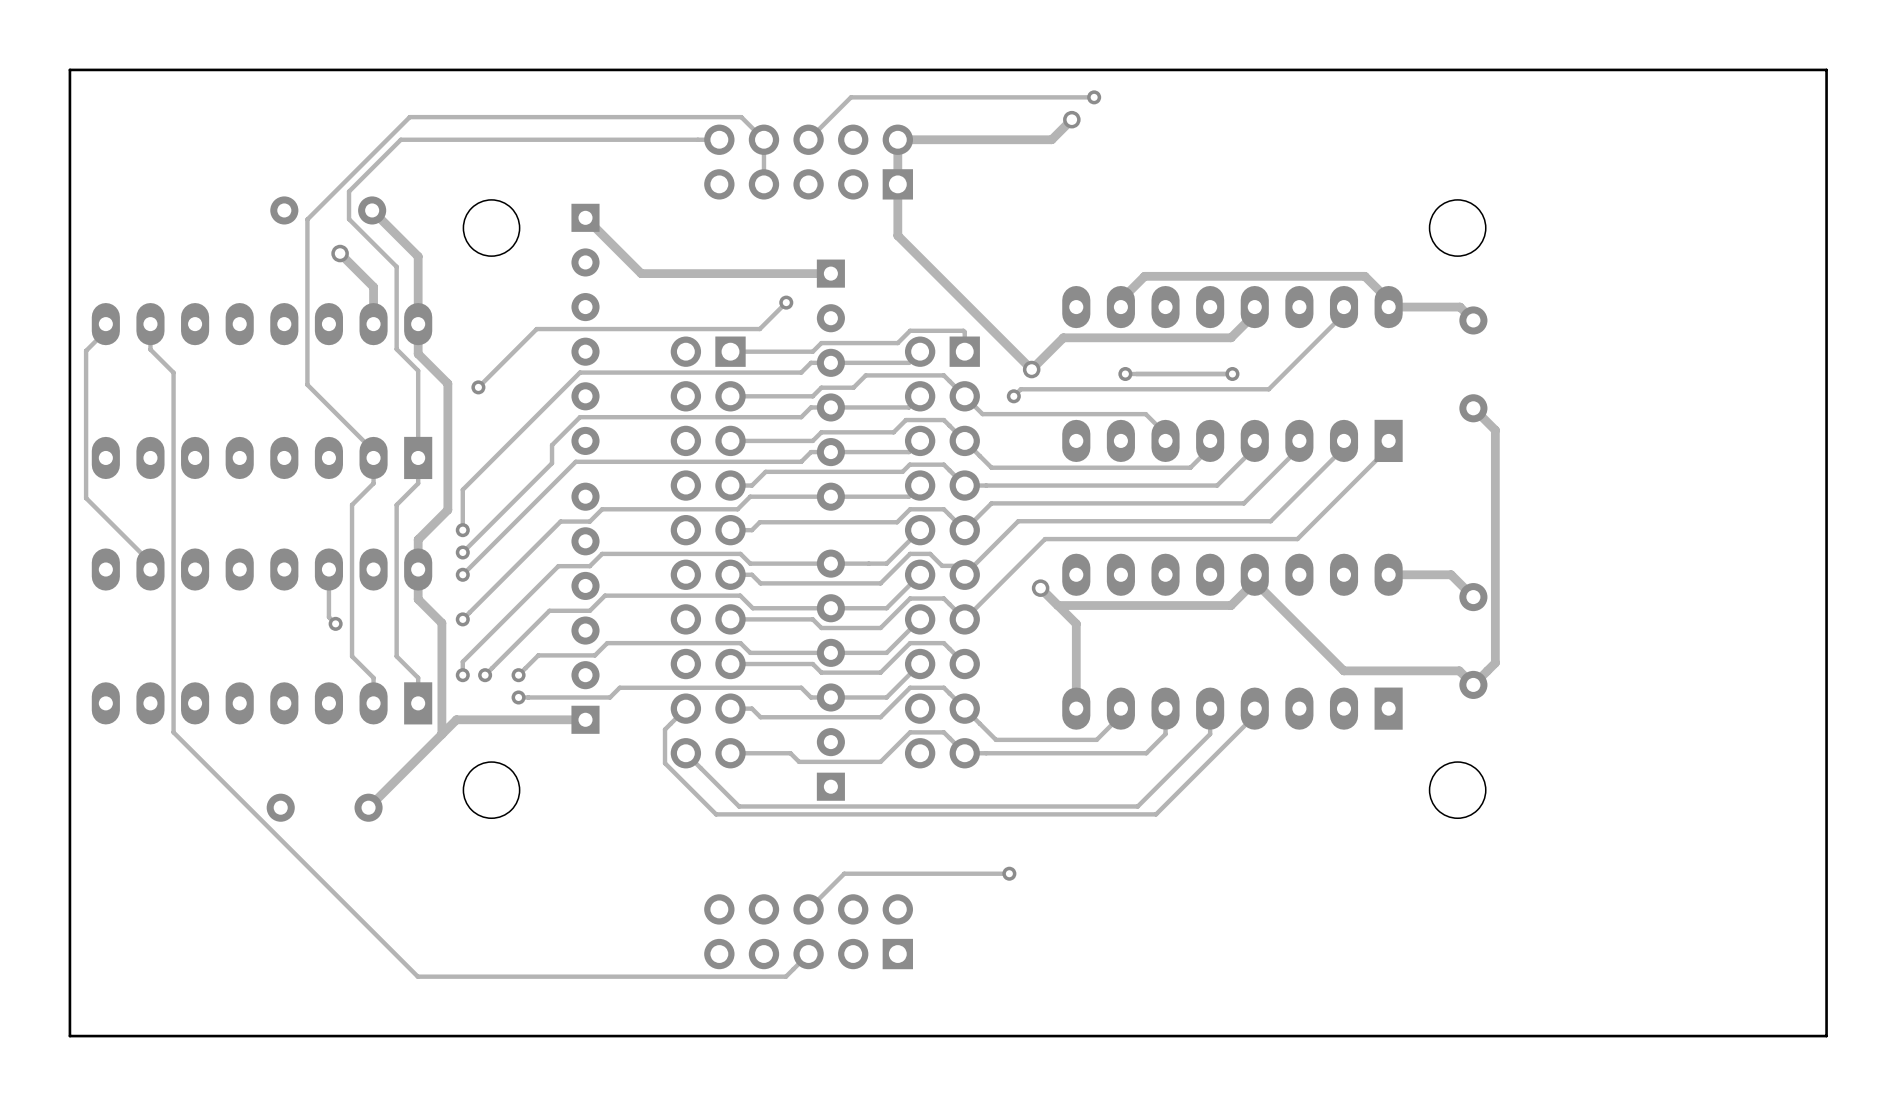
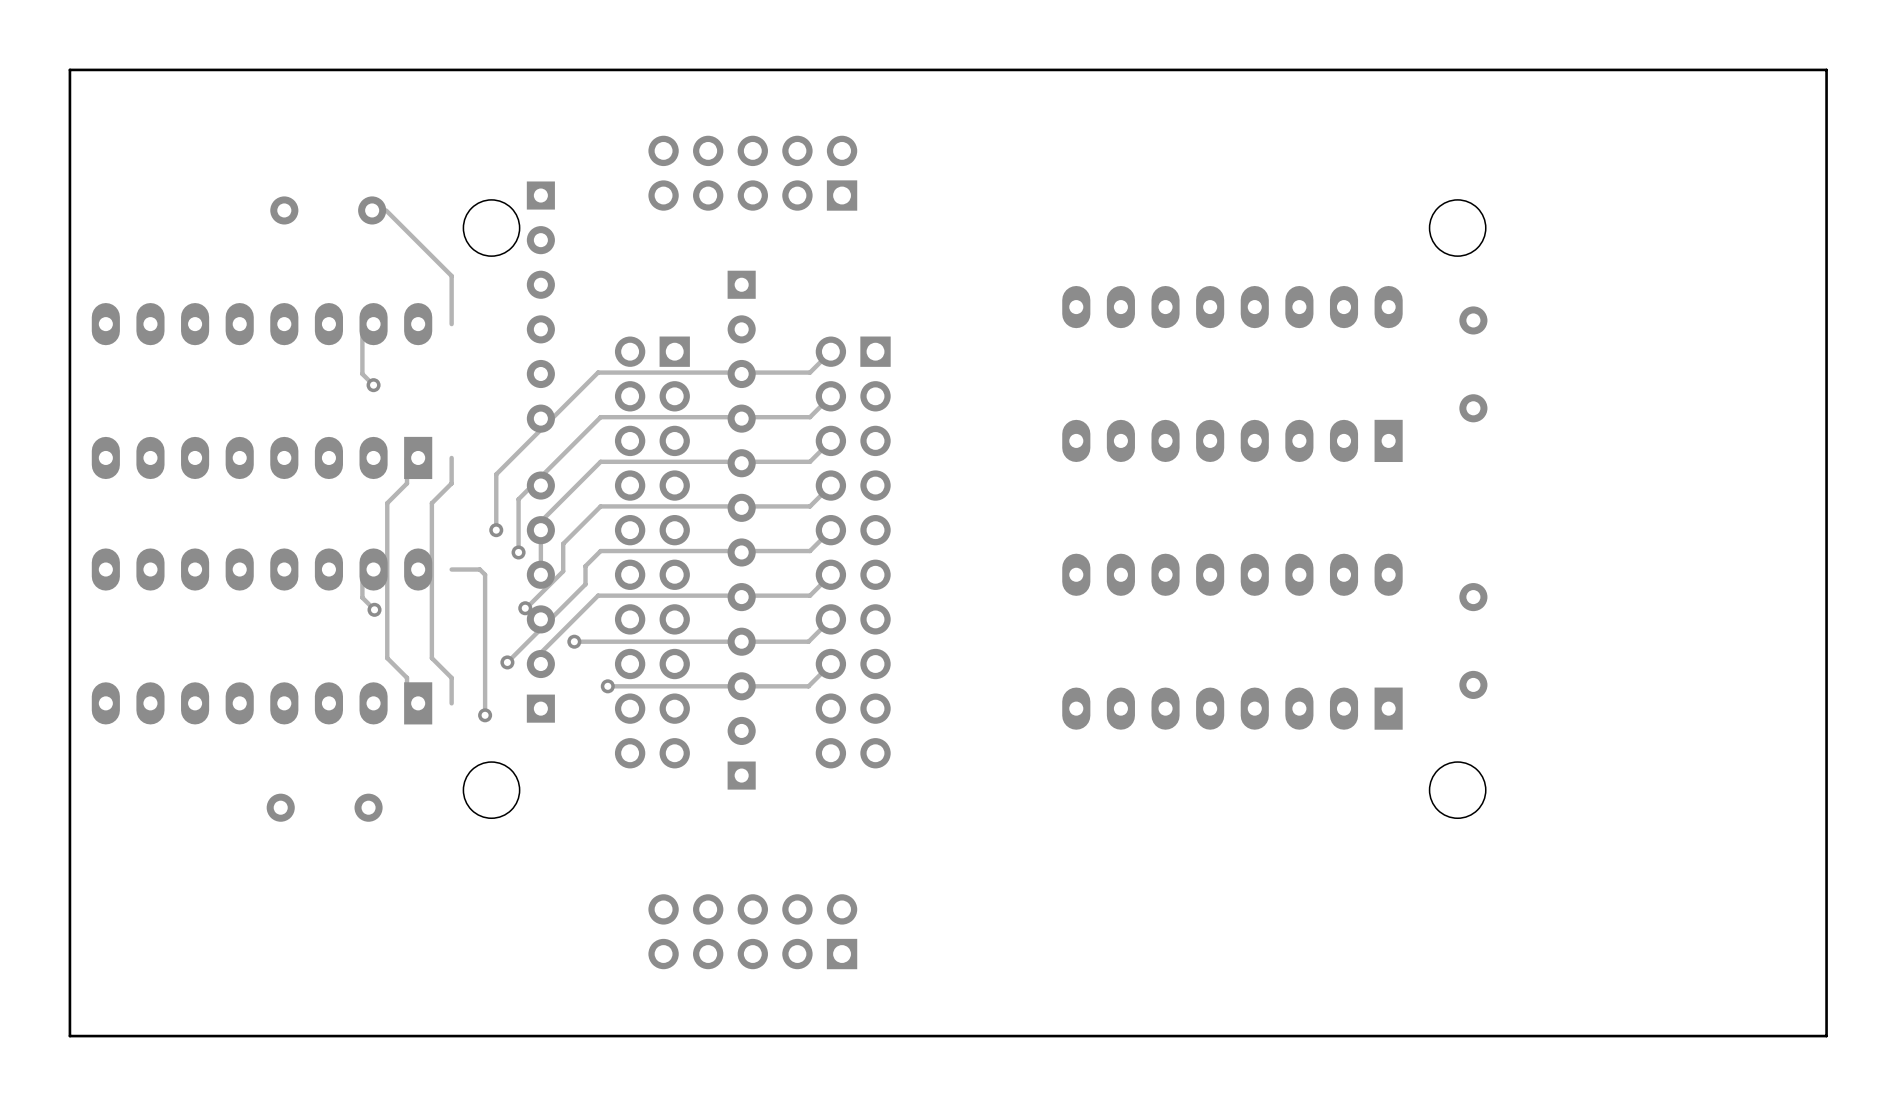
track: (1094, 97) (850, 97) (808, 139) -> none
via: (1094, 97) -> none
track: (1071, 119) (1051, 139) (897, 139) (897, 235) (1031, 369) (1063, 337) (1231, 337) (1254, 314) (1254, 307) -> none
via: (1071, 119) -> none
track: (719, 139) (400, 139) (349, 191) (349, 219) (396, 266) (396, 349) (418, 370) (418, 483) (396, 504) (396, 656) (418, 677) (418, 703) -> none
part position: (808, 162) -> (752, 173)
track: (763, 184) (763, 139) (741, 117) (409, 117) (307, 219) (307, 384) (373, 450) (373, 483) (352, 504) (352, 656) (373, 677) (373, 703) -> none
track: (372, 210) (418, 256) (418, 353) (447, 383) (447, 509) (418, 539) (418, 599) (441, 623) (441, 734) -> none
track: none -> (386, 210) (451, 275) (451, 324)
track: (585, 217) (641, 273) (830, 273) -> none
track: (340, 253) (373, 286) (373, 324) -> none
via: (340, 253) -> none
track: (786, 302) (759, 329) (536, 329) (478, 387) -> none
via: (786, 302) -> none
track: (1120, 307) (1120, 300) (1144, 276) (1364, 276) (1388, 300) (1388, 307) (1460, 307) (1473, 320) -> none
track: (1344, 307) (1344, 314) (1268, 389) (1020, 389) (1013, 396) -> none
track: (105, 324) (105, 331) (86, 350) (86, 498) (150, 562) (150, 569) -> none
track: (150, 324) (150, 349) (173, 372) (173, 732) (417, 976) (785, 976) (808, 954) -> none
track: none -> (362, 324) (362, 374) (373, 385)
part position: (585, 329) -> (540, 307)
track: (920, 351) (908, 362) (811, 362) (801, 372) -> (830, 351) (810, 372) (801, 372)
track: (964, 351) (963, 330) (910, 330) (897, 343) (821, 343) (812, 351) (730, 351) -> none
via: (1031, 369) -> none
track: (598, 372) (579, 372) (462, 489) (462, 530) -> (598, 372) (496, 474) (496, 530)
via: (1125, 374) -> none
track: (1232, 374) (1125, 374) -> none
via: (1232, 374) -> none
via: none -> (373, 385)
part: (830, 385) -> none
via: (478, 387) -> none
track: (730, 396) (812, 396) (821, 387) (853, 387) (865, 375) (943, 375) (982, 414) (1145, 414) (1165, 433) (1165, 440) -> none
part: none -> (741, 396)
track: (920, 396) (908, 407) (811, 407) (801, 417) -> (830, 396) (810, 417) (801, 417)
via: (1013, 396) -> none
track: (1473, 408) (1495, 430) (1495, 662) (1473, 684) (1459, 670) (1343, 670) (1254, 581) -> none
track: (600, 417) (579, 417) (552, 445) (552, 463) (462, 552) -> (600, 417) (518, 499) (518, 552)
track: (920, 440) (908, 452) (811, 452) (801, 461) -> (830, 440) (810, 461) (801, 461)
track: (1210, 440) (1210, 447) (1190, 467) (991, 467) (943, 420) (905, 420) (893, 432) (821, 432) (812, 440) (730, 440) -> none
track: (1254, 440) (1254, 447) (1217, 485) (964, 485) (943, 464) (909, 464) (902, 471) (765, 471) (751, 485) (730, 485) -> none
track: (1299, 440) (1299, 447) (1243, 503) (991, 503) (964, 530) (943, 509) (910, 509) (897, 522) (759, 522) (751, 530) (730, 530) -> none
track: (1344, 440) (1344, 447) (1270, 521) (1018, 521) (964, 574) (955, 565) (942, 565) (930, 553) (910, 553) (880, 583) (760, 583) (751, 574) (730, 574) -> none
track: (1388, 440) (1388, 447) (1297, 539) (1045, 539) (964, 619) (943, 598) (910, 598) (880, 628) (821, 628) (812, 619) (730, 619) -> none
track: none -> (451, 457) (451, 483) (431, 503) (431, 658) (451, 677) (451, 703)
track: (600, 461) (575, 461) (462, 574) -> (600, 461) (540, 521) (540, 574)
track: none -> (407, 464) (407, 483) (387, 503) (387, 658) (407, 677) (407, 703)
track: none -> (830, 485) (810, 506) (600, 506) (563, 543) (563, 571) (525, 608)
track: (920, 485) (908, 496) (750, 496) (737, 509) (602, 509) (589, 521) (560, 521) (462, 619) -> none
via: (462, 530) -> none
via: none -> (496, 530)
track: none -> (830, 530) (810, 551) (600, 551) (585, 566) (585, 584) (507, 662)
track: (920, 530) (886, 563) (750, 563) (740, 553) (602, 553) (589, 566) (558, 566) (462, 661) (462, 675) -> none
via: (462, 552) -> none
via: none -> (518, 552)
part position: (708, 552) -> (652, 552)
part: none -> (853, 552)
part: (942, 552) -> none
track: (328, 569) (328, 617) (335, 623) -> none
track: none -> (451, 569) (479, 569) (485, 574) (485, 715)
via: (462, 574) -> none
track: (920, 574) (886, 608) (752, 608) (740, 595) -> (830, 574) (810, 595) (740, 595)
track: (1388, 574) (1451, 574) (1473, 597) -> none
track: none -> (362, 576) (362, 597) (374, 609)
track: (1254, 581) (1231, 605) (1057, 605) -> none
track: (1040, 588) (1076, 623) (1076, 708) -> none
via: (1040, 588) -> none
track: (605, 595) (589, 610) (549, 610) (485, 675) -> (605, 595) (598, 595) (540, 652)
via: none -> (525, 608)
part position: (585, 608) -> (540, 597)
via: (462, 619) -> none
track: none -> (830, 619) (808, 641) (574, 641)
track: (920, 619) (886, 652) (750, 652) (740, 643) (607, 643) (594, 655) (538, 655) (518, 675) -> none
via position: (335, 623) -> (374, 609)
via: none -> (574, 641)
part: none -> (741, 664)
track: none -> (830, 664) (808, 686) (607, 686)
track: (920, 664) (886, 697) (811, 697) (801, 687) (619, 687) (610, 697) (518, 697) -> none
track: (964, 664) (943, 643) (910, 643) (880, 672) (821, 672) (812, 664) (730, 664) -> none
via: (462, 675) -> none
via: (485, 675) -> none
via position: (518, 675) -> (507, 662)
part: (830, 675) -> none
via: none -> (607, 686)
via: (518, 697) -> none
track: (1120, 708) (1120, 715) (1096, 739) (995, 739) (943, 687) (910, 687) (880, 717) (760, 717) (751, 708) (730, 708) -> none
track: (1165, 708) (1165, 734) (1146, 753) (964, 753) (943, 732) (910, 732) (880, 761) (799, 761) (790, 753) (730, 753) -> none
track: (1210, 708) (1210, 734) (1137, 806) (739, 806) (685, 753) -> none
track: (1254, 708) (1254, 715) (1156, 814) (716, 814) (665, 763) (665, 729) (685, 708) -> none
via: none -> (485, 715)
track: (585, 719) (456, 719) (368, 807) -> none
track: (1009, 873) (844, 873) (808, 909) -> none
via: (1009, 873) -> none
part position: (808, 931) -> (752, 931)

